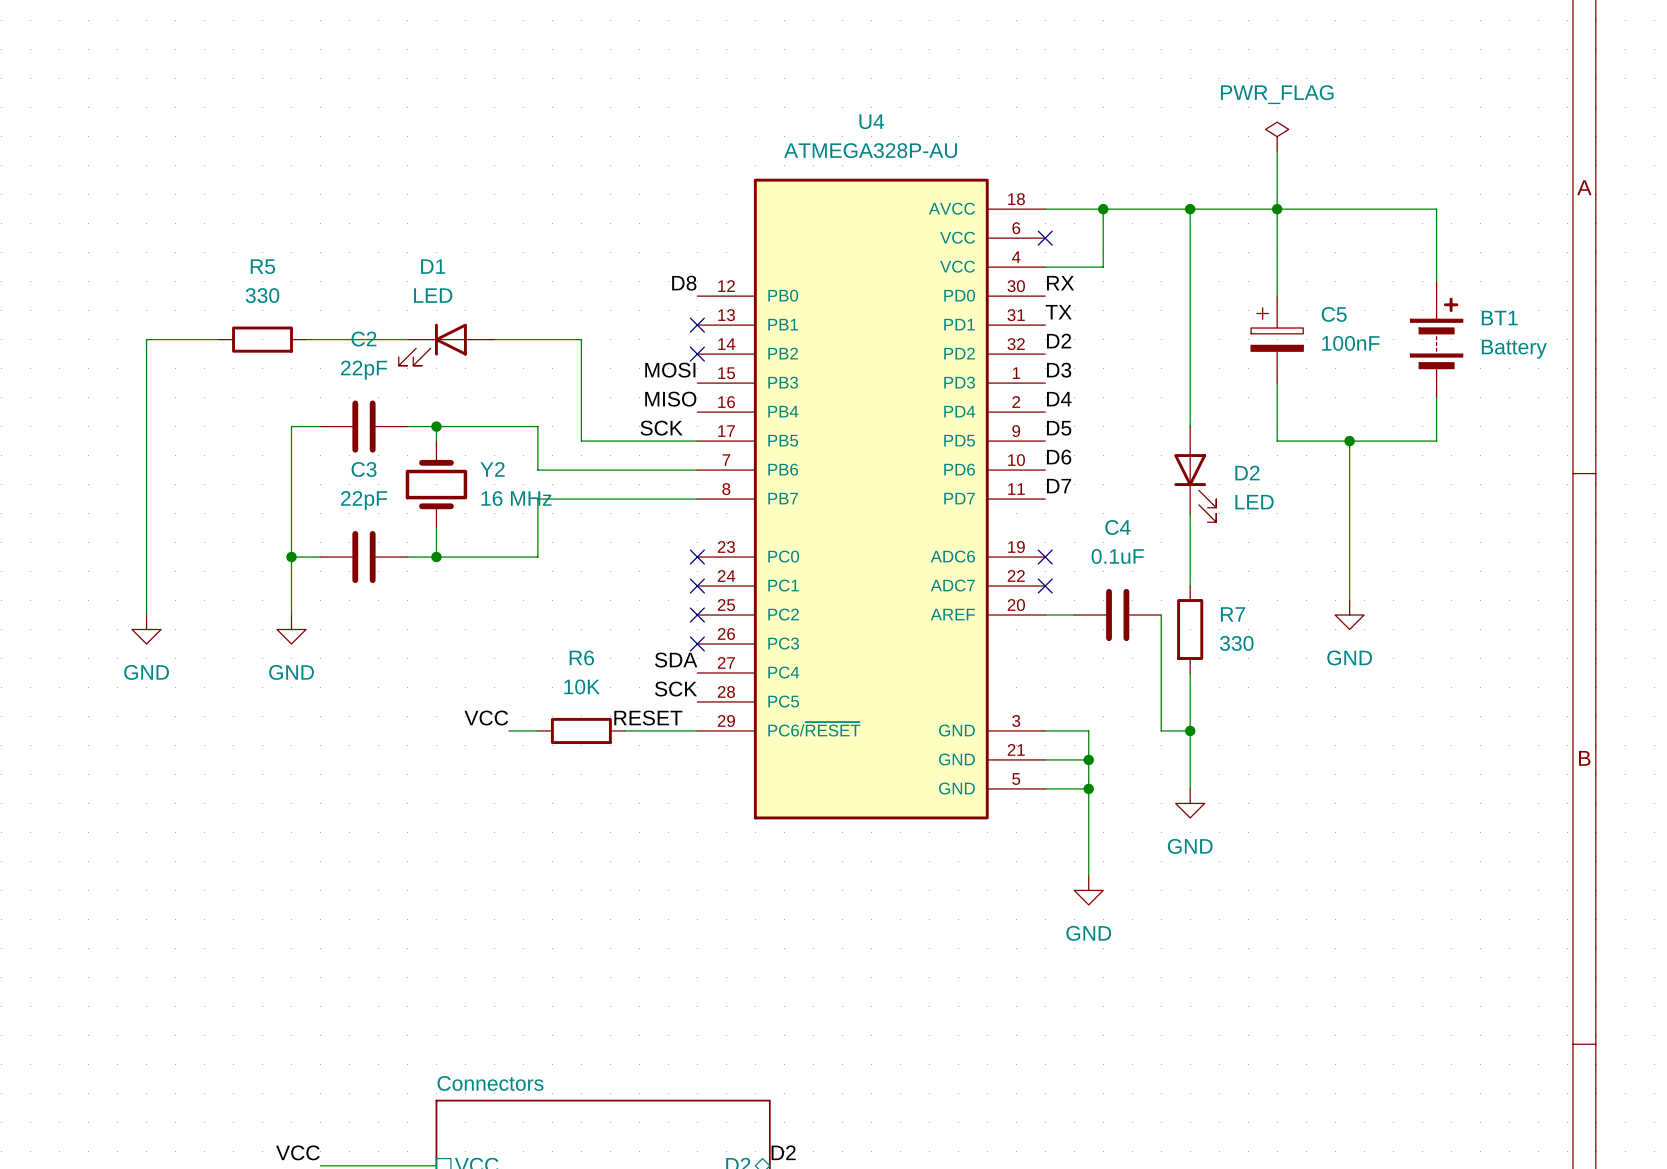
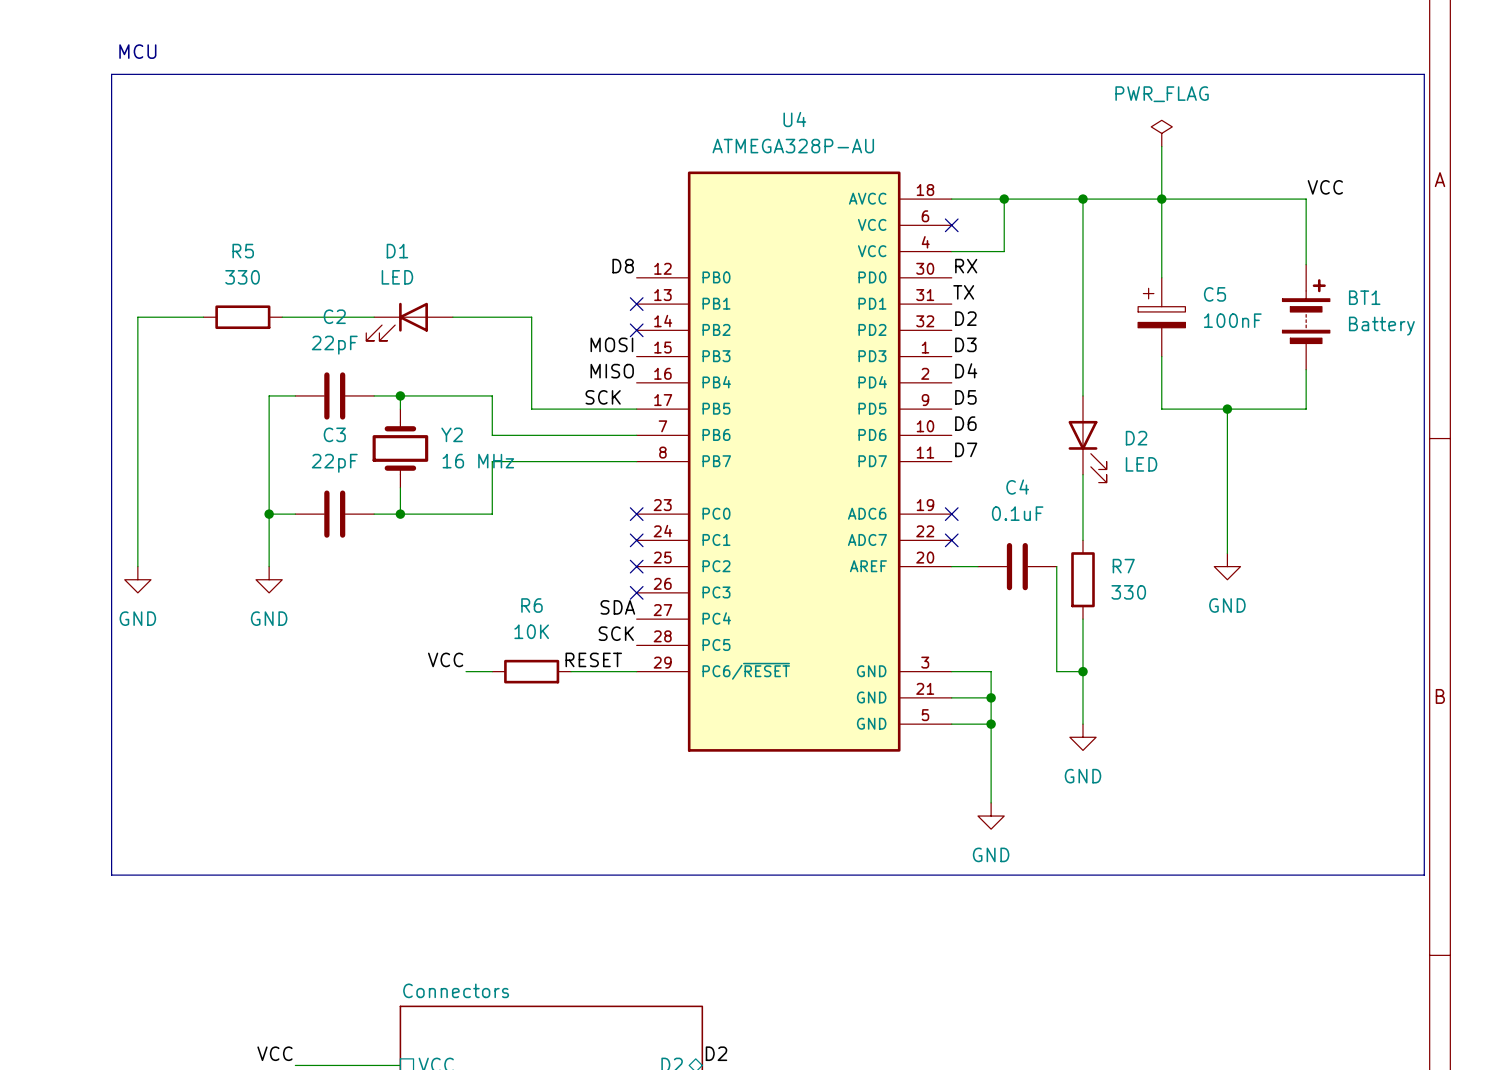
text: none -> MCU (137, 51)
line: none -> (111, 74) (1424, 74) (1424, 875) (111, 875) (111, 74)
label: none -> VCC (1325, 187)

